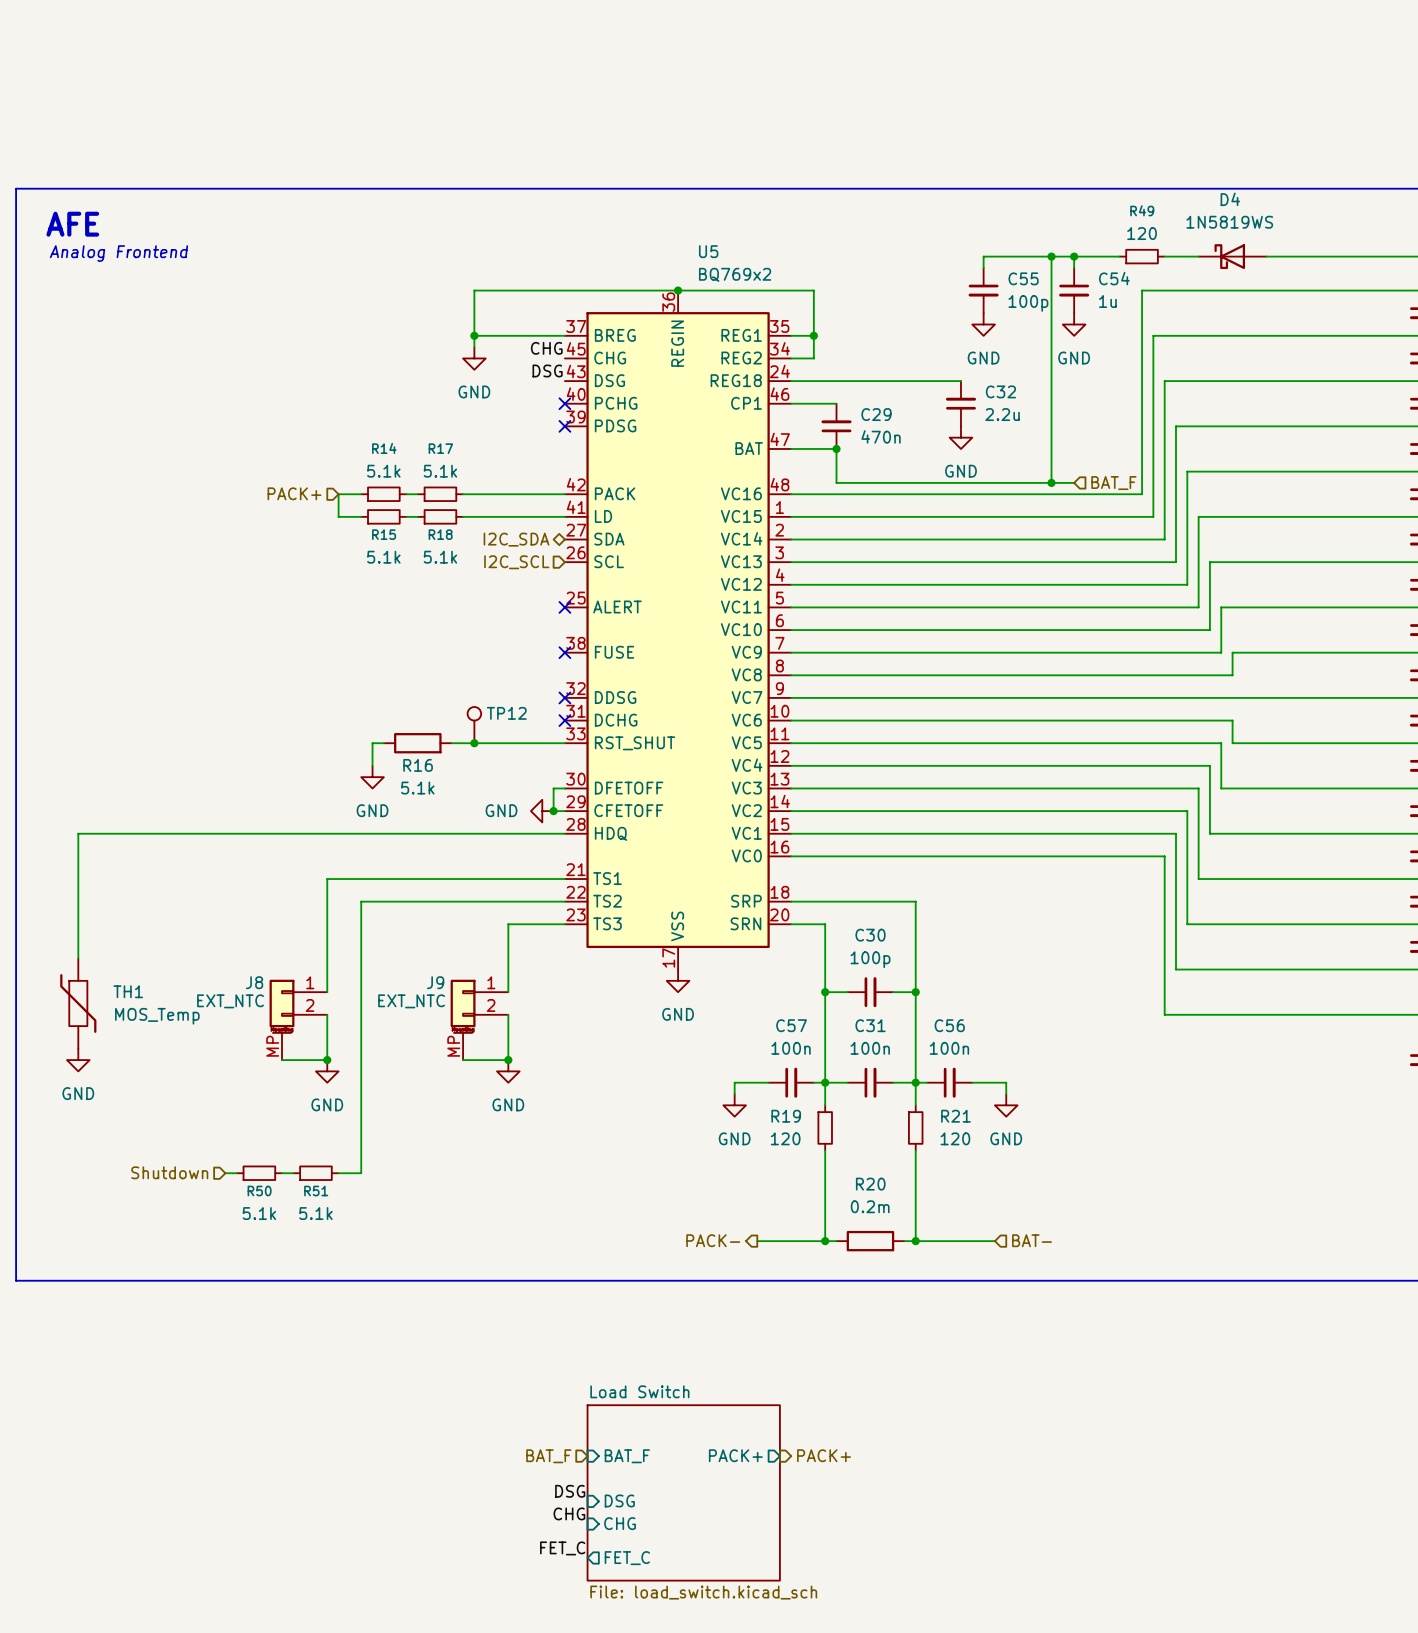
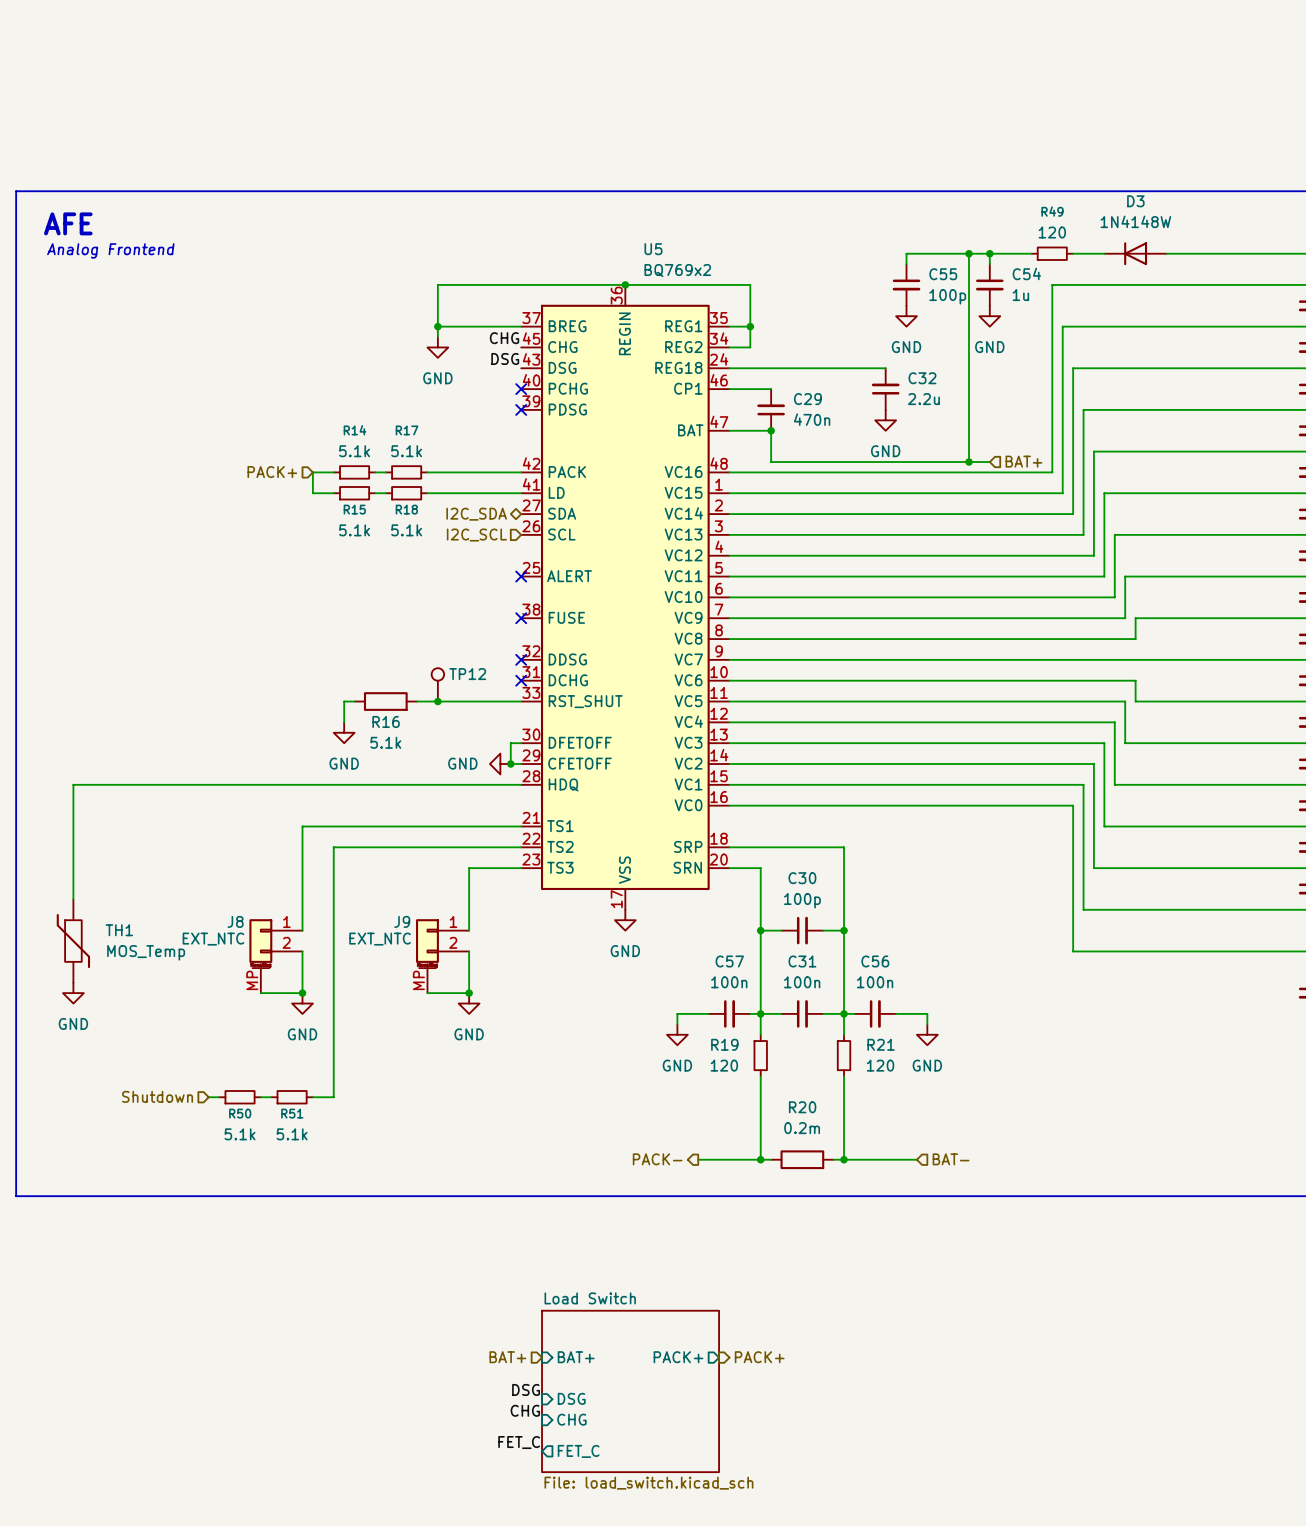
D4: 1N5819WS (1232, 256) -> none
D3: none -> 1N4148W (1135, 253)
hierarchical label: BAT_F (1113, 483) -> BAT+ (1023, 461)
hierarchical label: BAT_F (548, 1456) -> BAT+ (507, 1357)
sheet pin: BAT_F (627, 1456) -> BAT+ (576, 1357)

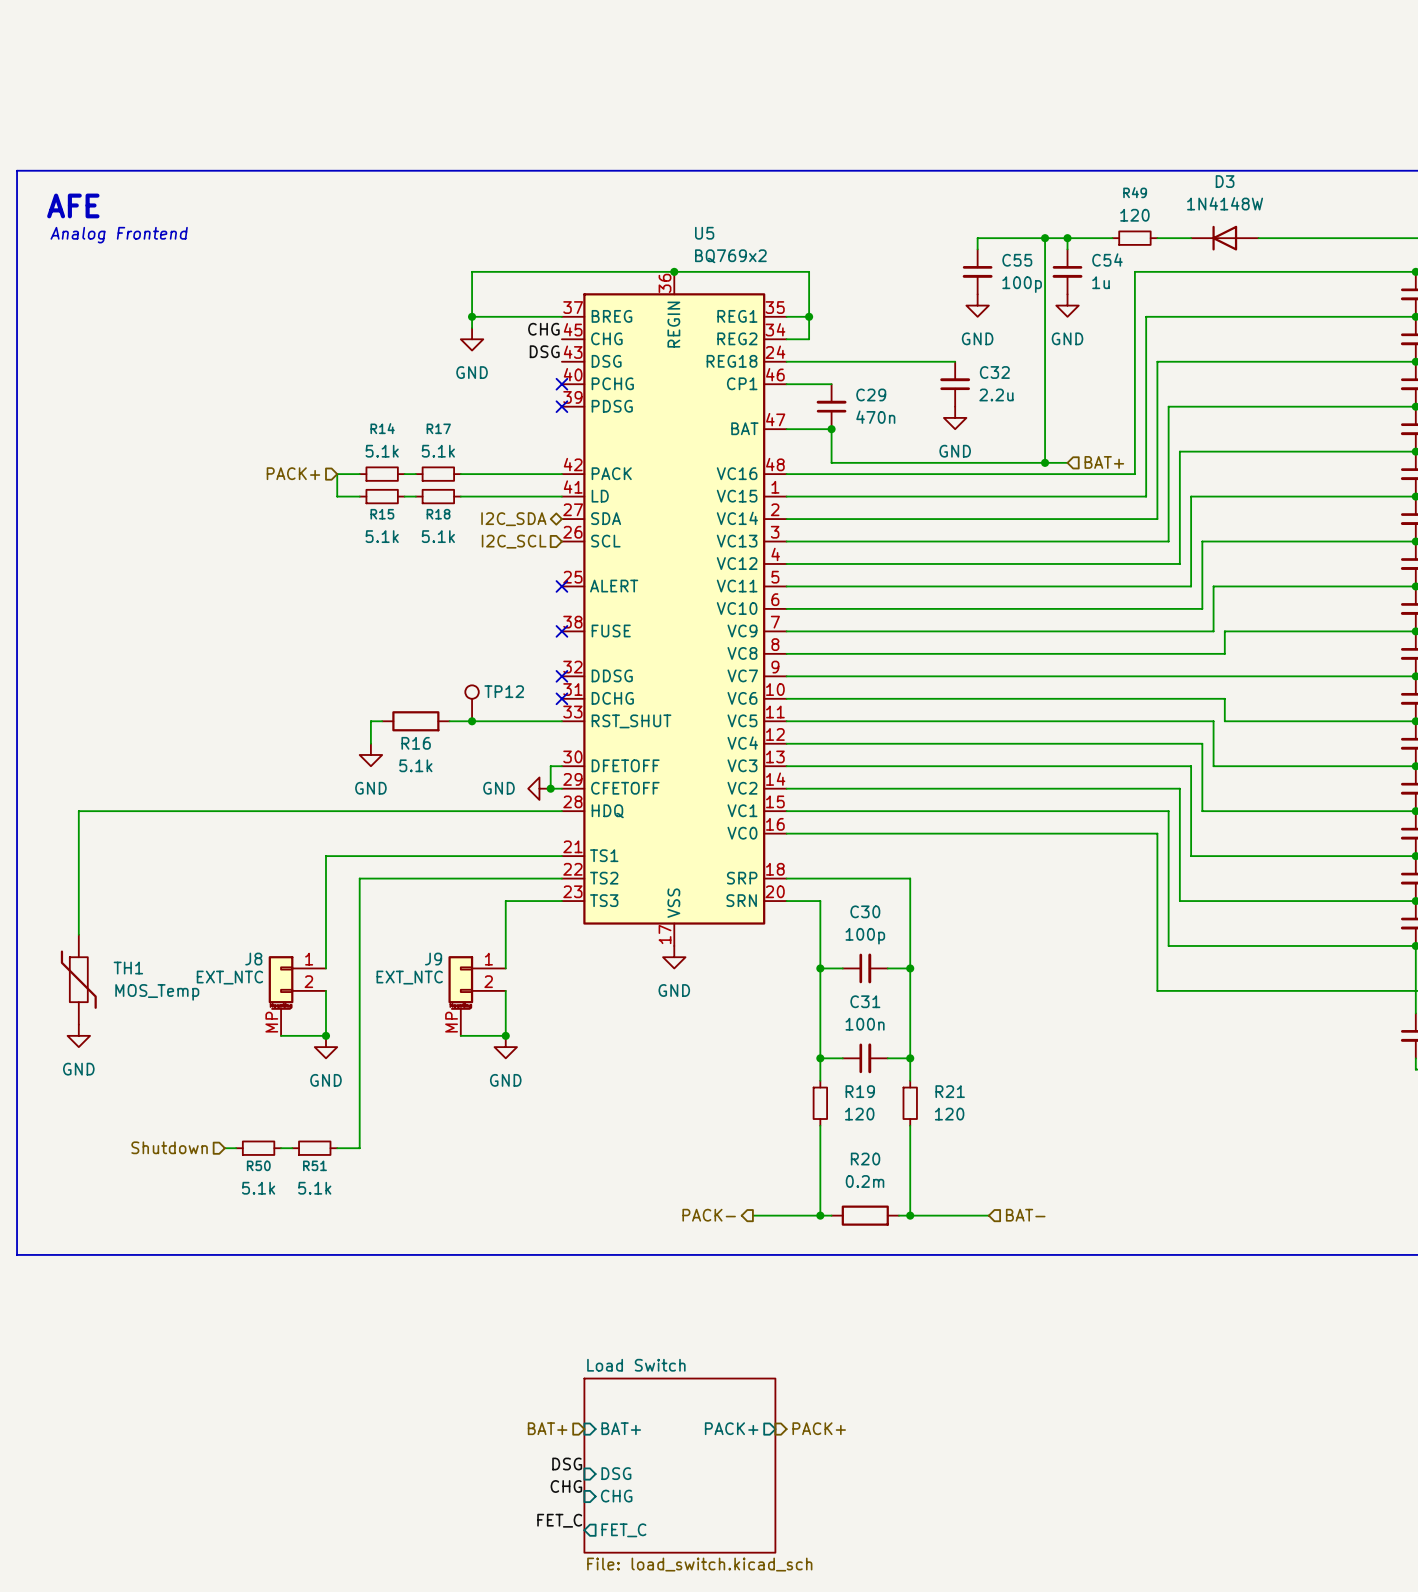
wire: (708, 1013) (677, 1013) (677, 1024) -> none
C57: 100n (729, 1013) -> none
wire: (750, 1013) (760, 1013) -> none
wire: (844, 1013) (854, 1013) -> none
C56: 100n (875, 1013) -> none
wire: (896, 1013) (927, 1013) (927, 1024) -> none
power symbol: GND (677, 1034) -> none
power symbol: GND (927, 1034) -> none
R19 name position: R19 (724, 1044) -> R19 (860, 1091)
R19 value position: 120 (724, 1065) -> 120 (859, 1114)

